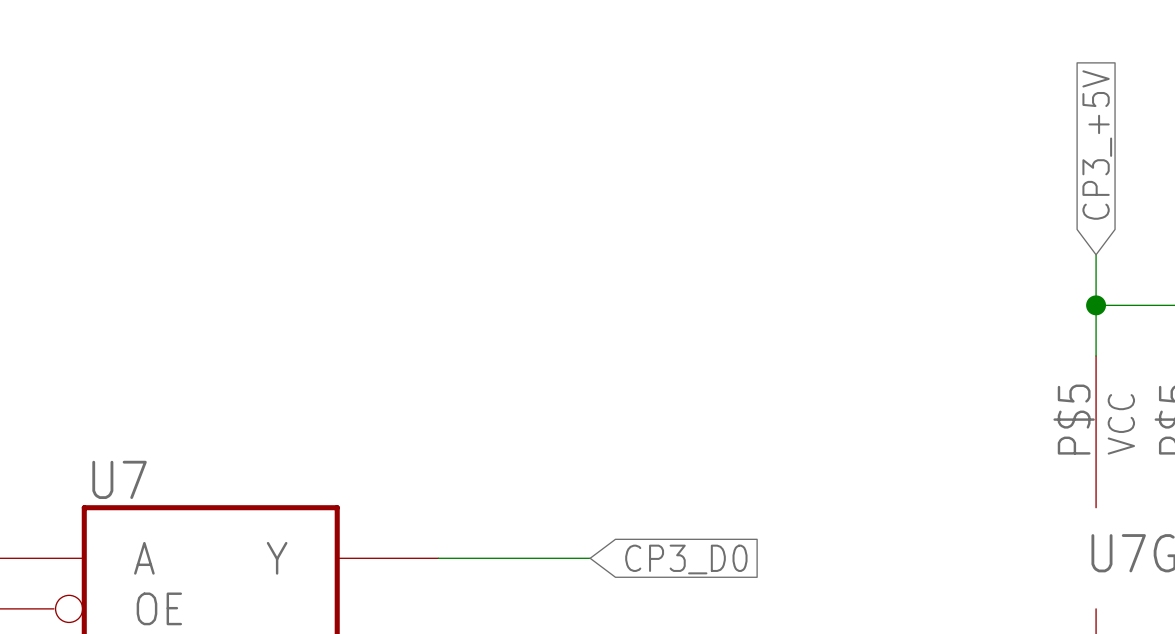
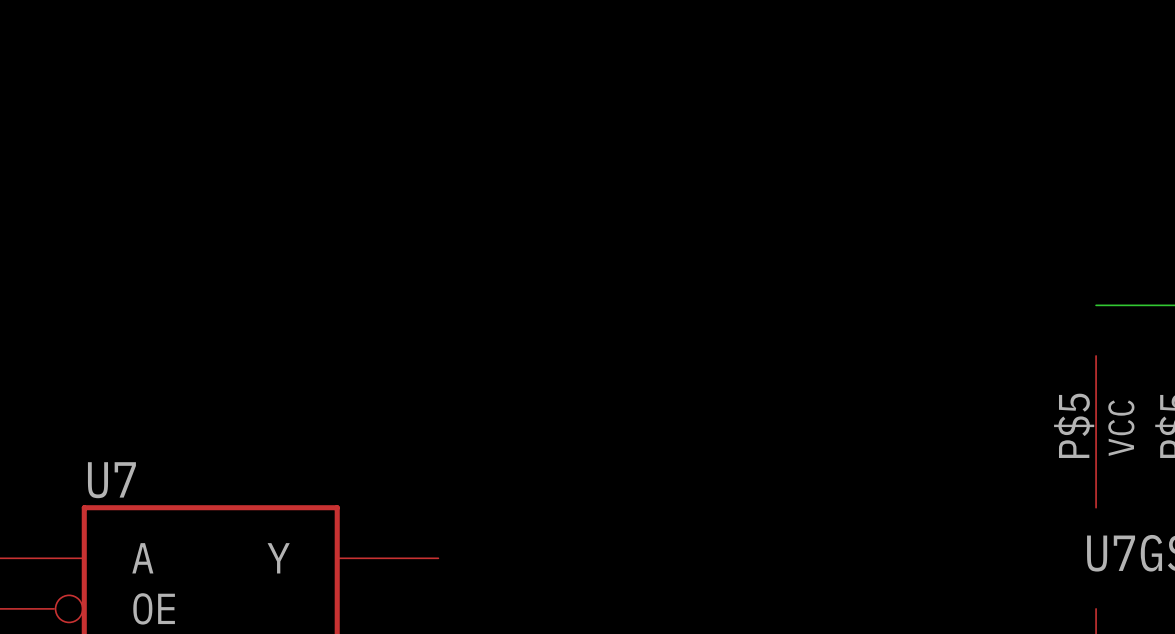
global label: CP3_+5V (1097, 145) -> none
wire: (1096, 254) (1096, 355) -> none
junction: (1096, 305) -> none
wire: (438, 558) (590, 558) -> none
global label: CP3_D0 (686, 559) -> none

